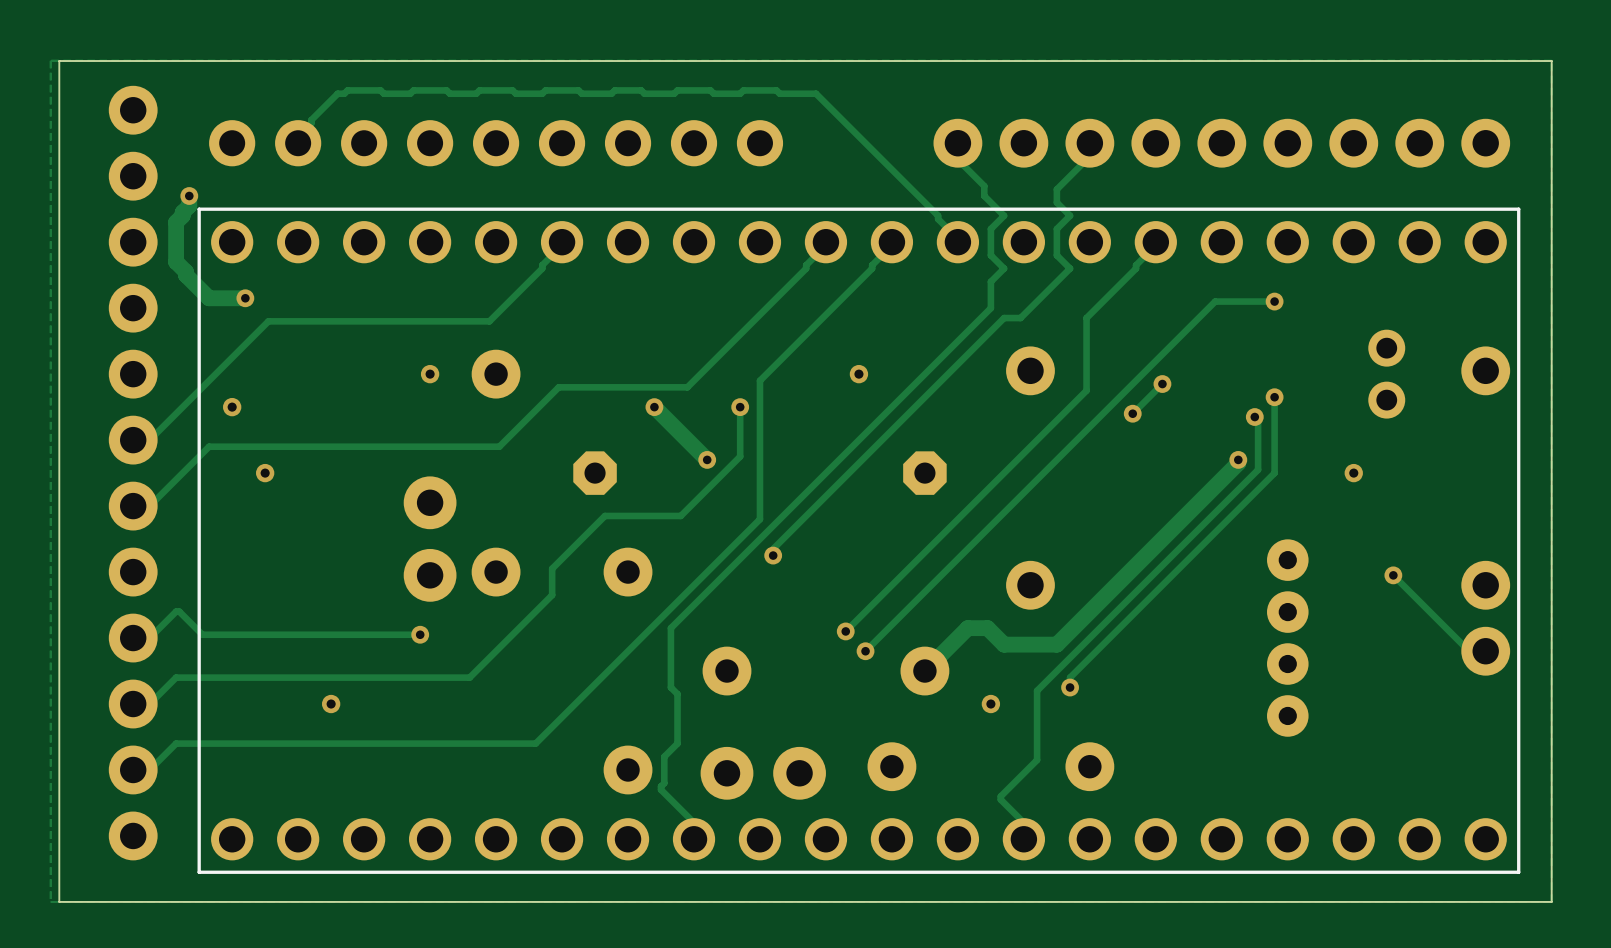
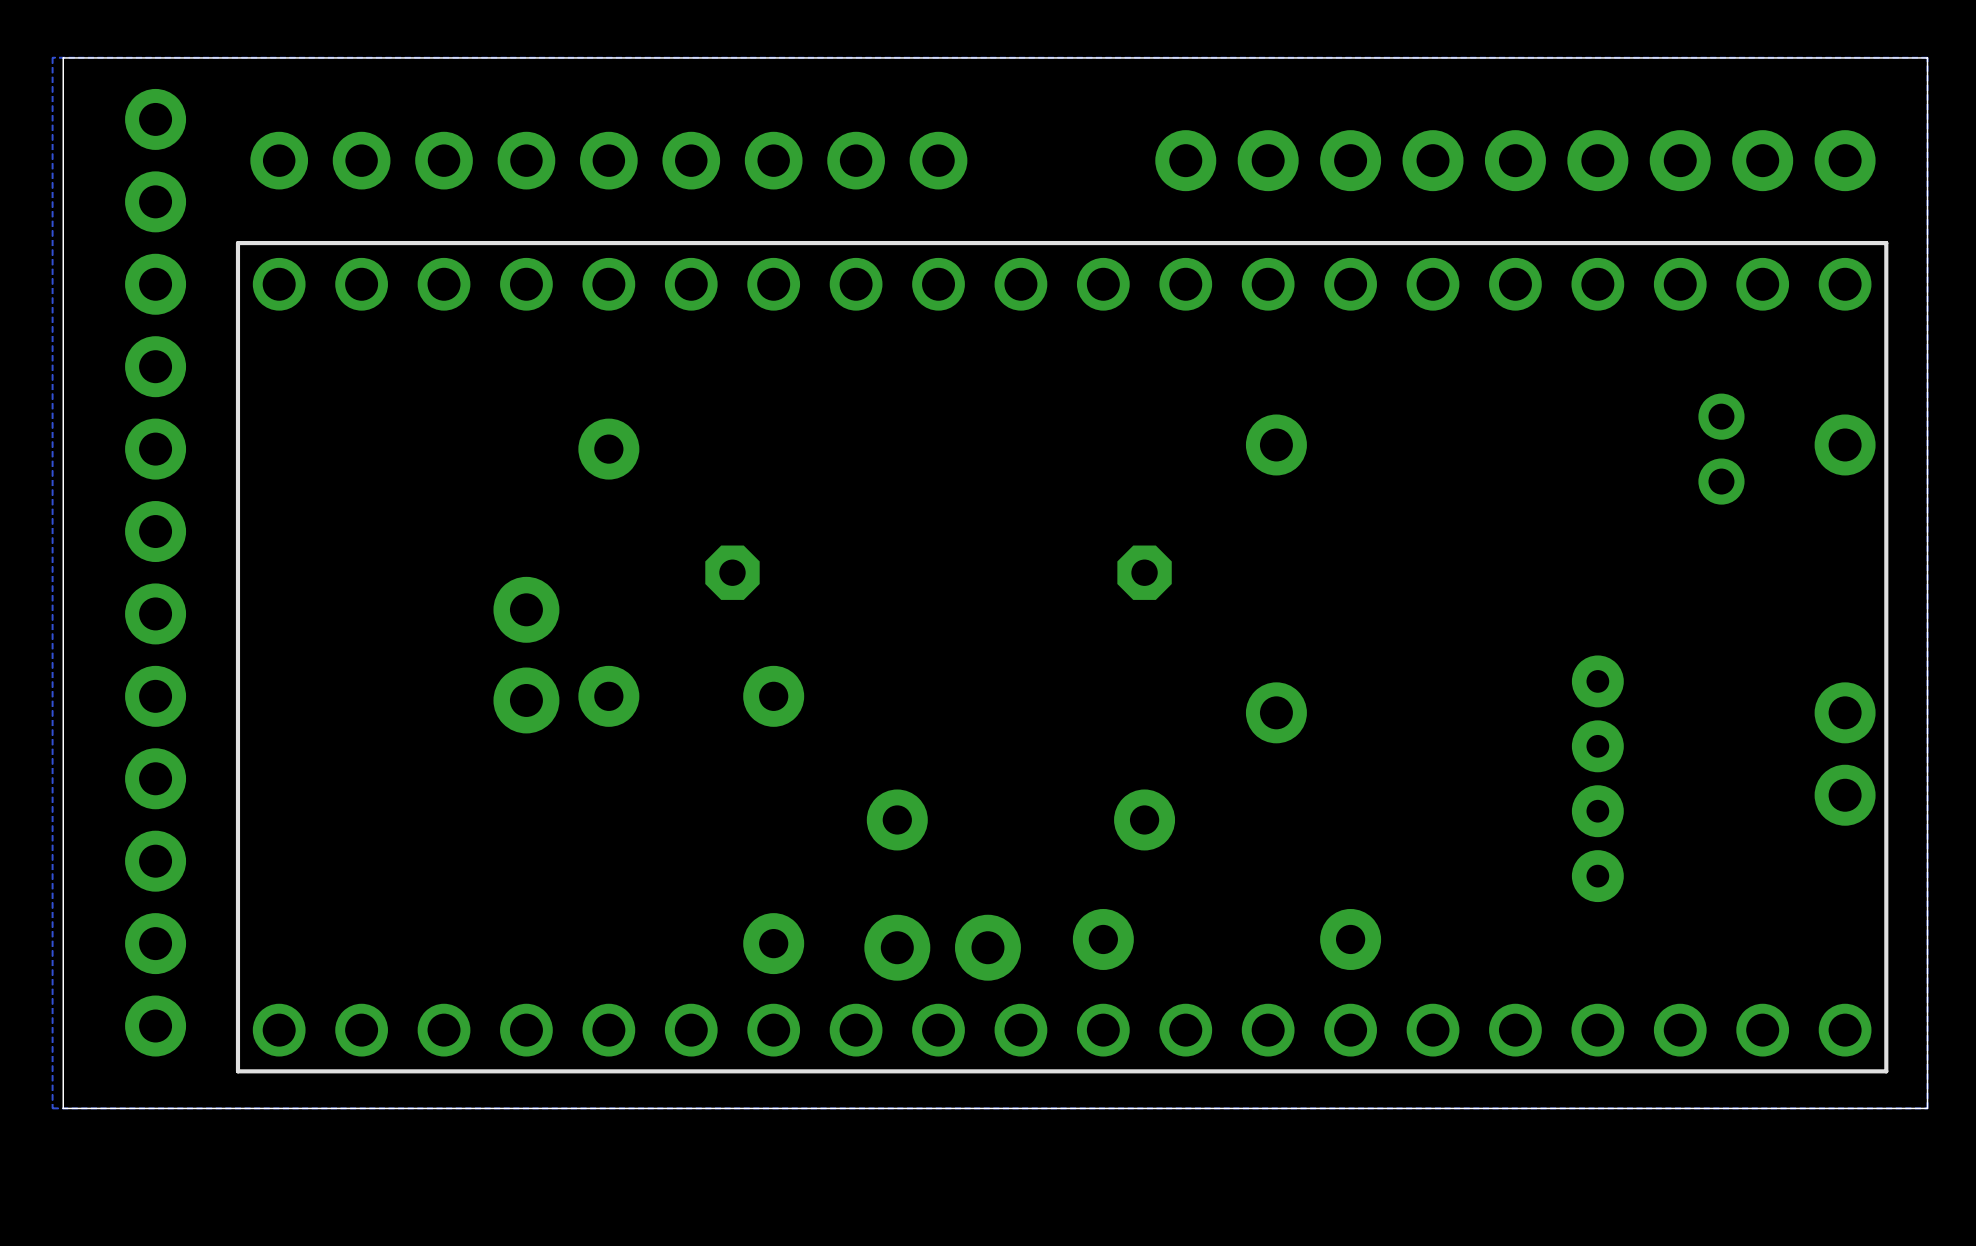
track: (298, 143) (298, 136) (311, 123) (311, 120) (337, 93) (344, 93) (347, 90) (380, 90) (383, 93) (410, 93) (413, 90) (446, 90) (449, 93) (476, 93) (479, 90) (512, 90) (515, 93) (542, 93) (545, 90) (578, 90) (581, 93) (611, 93) (614, 90) (641, 90) (644, 93) (674, 93) (677, 90) (710, 90) (713, 93) (740, 93) (743, 90) (776, 90) (779, 93) (816, 93) (938, 215) (938, 219) (957, 242) -> none
track: (957, 143) (957, 159) (984, 186) (984, 196) (1004, 215) (990, 228) (990, 255) (1004, 268) (990, 281) (990, 308) (670, 628) (670, 687) (677, 694) (677, 743) (664, 756) (664, 783) (661, 789) (694, 822) (694, 839) -> none
track: (1089, 143) (1089, 156) (1056, 189) (1056, 202) (1070, 215) (1056, 228) (1056, 255) (1070, 268) (1020, 318) (1004, 318) (773, 548) (773, 555) -> none
track: (189, 196) (189, 205) (176, 222) (176, 261) (185, 271) (185, 275) (209, 298) (245, 298) -> none
via: (189, 196) -> none
track: (562, 242) (542, 265) (542, 268) (489, 321) (268, 321) (149, 440) (133, 440) -> none
track: (825, 242) (806, 265) (806, 268) (687, 387) (558, 387) (499, 446) (209, 446) (149, 506) (133, 506) -> none
track: (891, 242) (872, 265) (872, 268) (759, 380) (759, 519) (535, 743) (176, 743) (149, 769) (133, 769) -> none
track: (1155, 242) (1136, 265) (1136, 268) (1086, 318) (1086, 390) (845, 631) -> none
via: (245, 298) -> none
track: (1274, 301) (1215, 301) (865, 651) -> none
via: (1274, 301) -> none
via: (430, 374) -> none
via: (858, 374) -> none
track: (1162, 384) (1132, 413) -> none
via: (1162, 384) -> none
track: (1274, 397) (1274, 473) (1070, 677) (1070, 687) -> none
via: (1274, 397) -> none
via: (232, 407) -> none
track: (654, 407) (707, 459) -> none
via: (654, 407) -> none
track: (740, 407) (740, 456) (680, 515) (604, 515) (552, 568) (552, 595) (469, 677) (176, 677) (149, 704) (133, 704) -> none
via: (740, 407) -> none
via: (1132, 413) -> none
track: (1254, 417) (1258, 420) (1258, 469) (1037, 690) (1037, 760) (1000, 796) (1000, 799) (1023, 822) (1023, 839) -> none
via: (1254, 417) -> none
via: (707, 459) -> none
track: (1238, 459) (1238, 463) (1056, 644) (1004, 644) (987, 628) (967, 628) (924, 671) -> none
via: (1238, 459) -> none
via: (265, 473) -> none
via: (1353, 473) -> none
via: (773, 555) -> none
track: (1393, 575) (1469, 651) (1485, 651) -> none
via: (1393, 575) -> none
via: (845, 631) -> none
track: (420, 634) (202, 634) (179, 611) (176, 611) (149, 638) (133, 638) -> none
via: (420, 634) -> none
via: (865, 651) -> none
via: (1070, 687) -> none
via: (331, 704) -> none
via: (990, 704) -> none

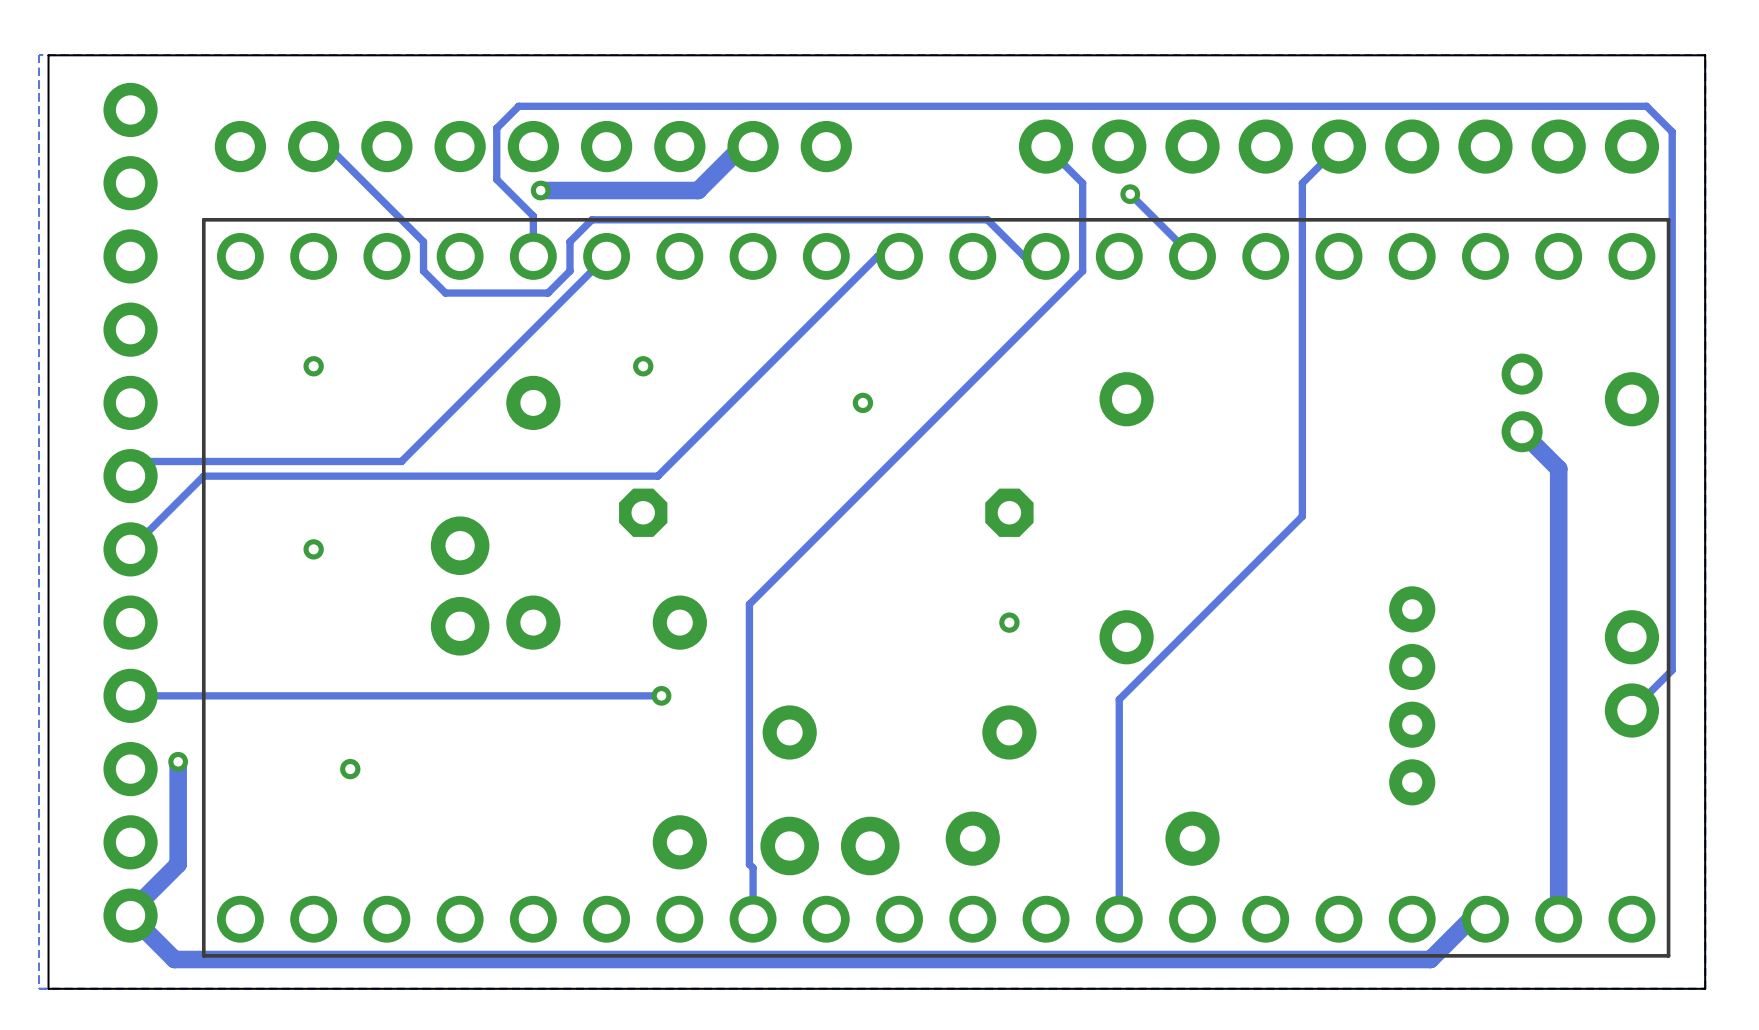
track: none -> (313, 146) (328, 146) (423, 241) (423, 271) (445, 293) (548, 293) (569, 271) (569, 241) (591, 219) (987, 219) (1024, 256) (1046, 256)
track: none -> (753, 146) (742, 146) (698, 190) (540, 190)
track: none -> (1046, 146) (1082, 183) (1082, 271) (749, 604) (749, 864) (753, 867) (753, 919)
track: none -> (1338, 146) (1302, 183) (1302, 516) (1119, 699) (1119, 919)
via: none -> (540, 190)
track: none -> (1130, 194) (1192, 256)
via: none -> (1130, 194)
track: none -> (533, 256) (533, 216) (496, 179) (496, 128) (518, 106) (1646, 106) (1672, 131) (1672, 670) (1631, 710)
track: none -> (606, 256) (401, 461) (145, 461) (130, 476)
track: none -> (899, 256) (877, 256) (657, 476) (203, 476) (130, 549)
via: none -> (313, 366)
via: none -> (643, 366)
via: none -> (862, 402)
track: none -> (1522, 432) (1558, 468) (1558, 919)
via: none -> (313, 549)
via: none -> (1009, 622)
track: none -> (661, 695) (130, 695)
via: none -> (661, 695)
track: none -> (178, 761) (178, 864) (134, 908) (130, 915) (174, 959) (1430, 959) (1470, 919) (1485, 919)
via: none -> (178, 761)
via: none -> (350, 769)

